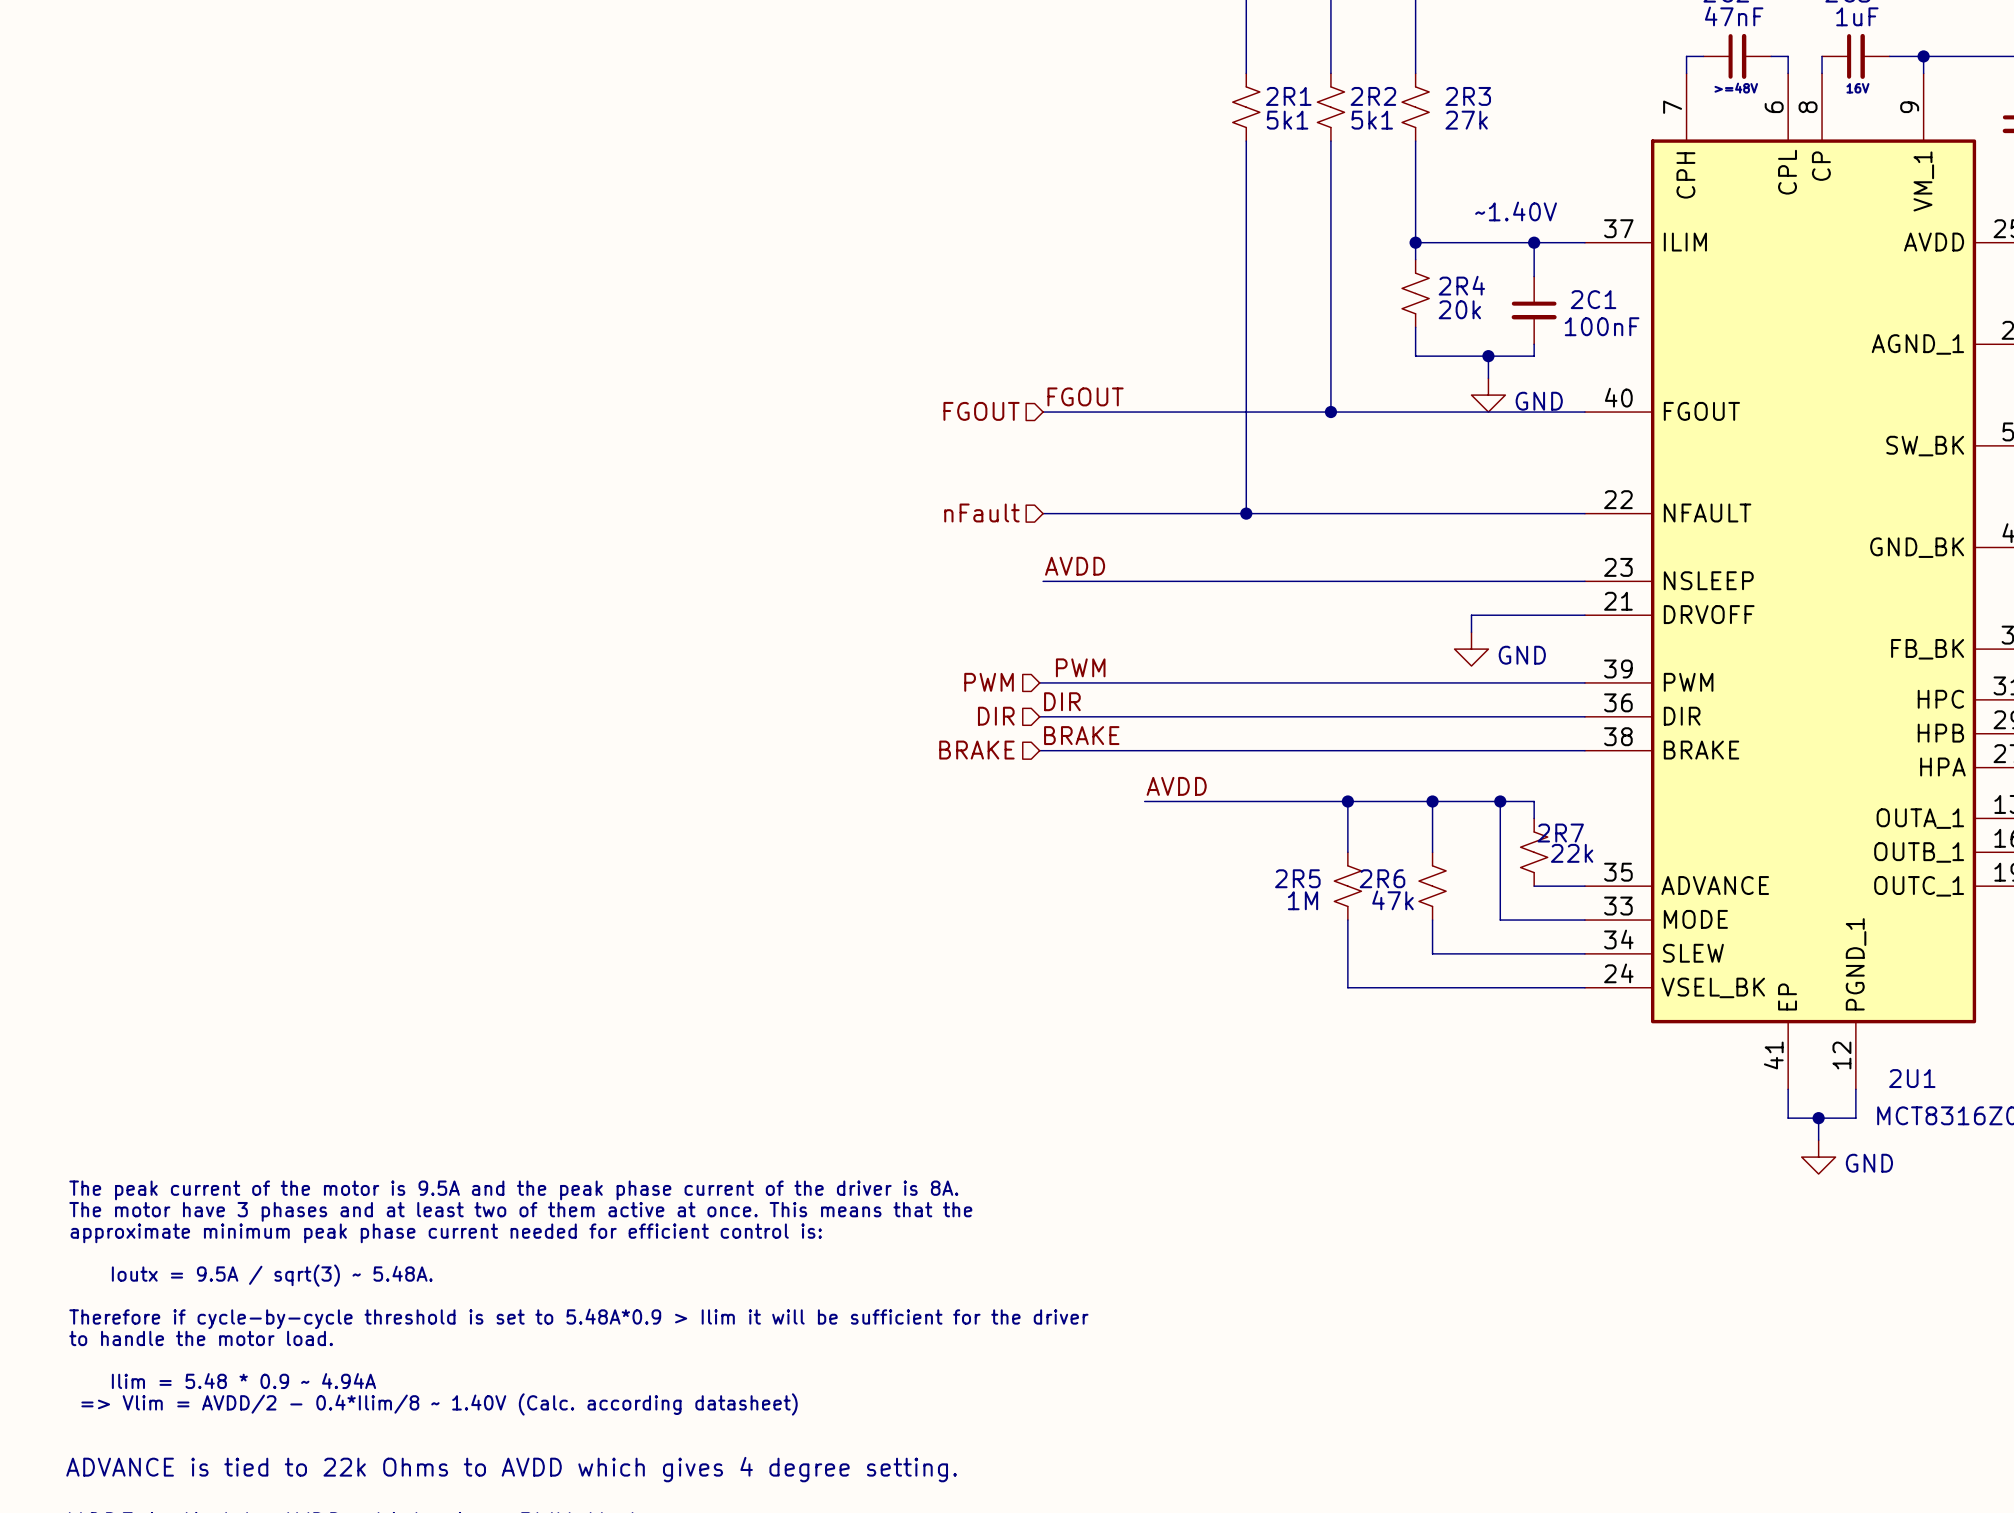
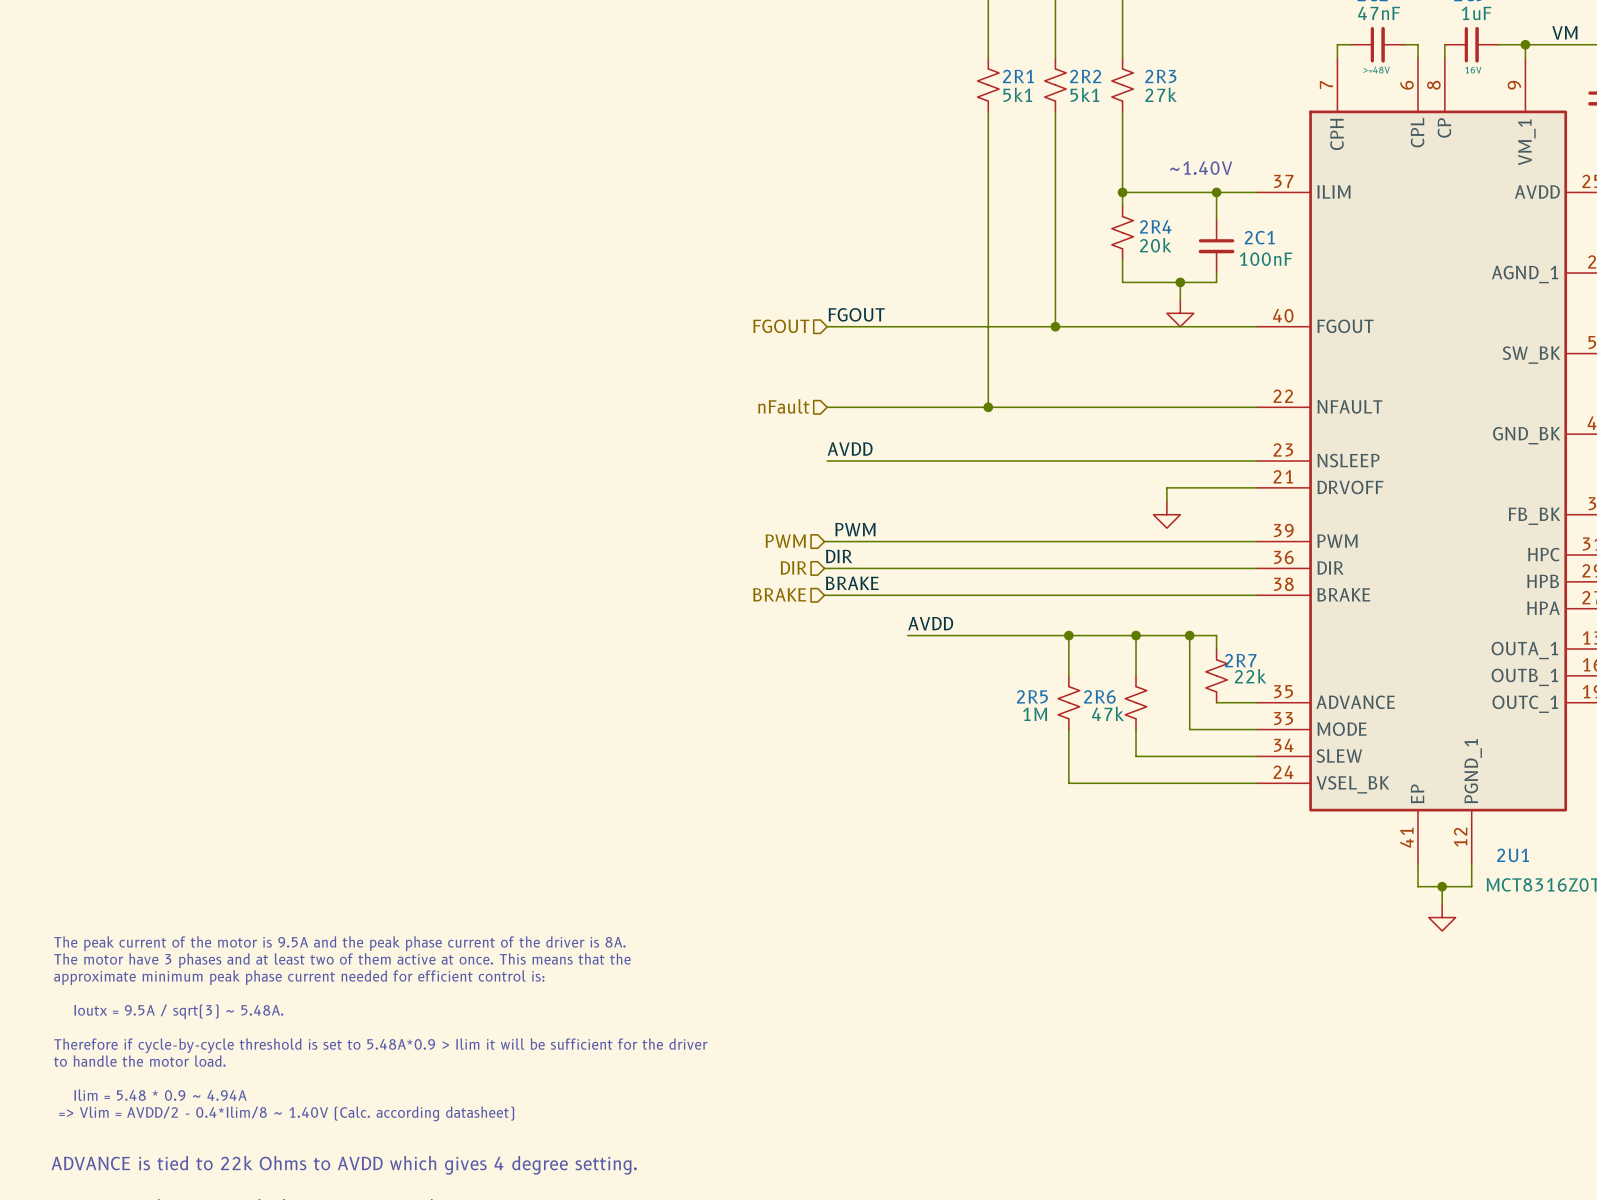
label: none -> VM (1564, 32)
power symbol text: GND (1539, 401) -> none
power symbol text: GND (1522, 655) -> none
power symbol text: GND (1869, 1163) -> none

